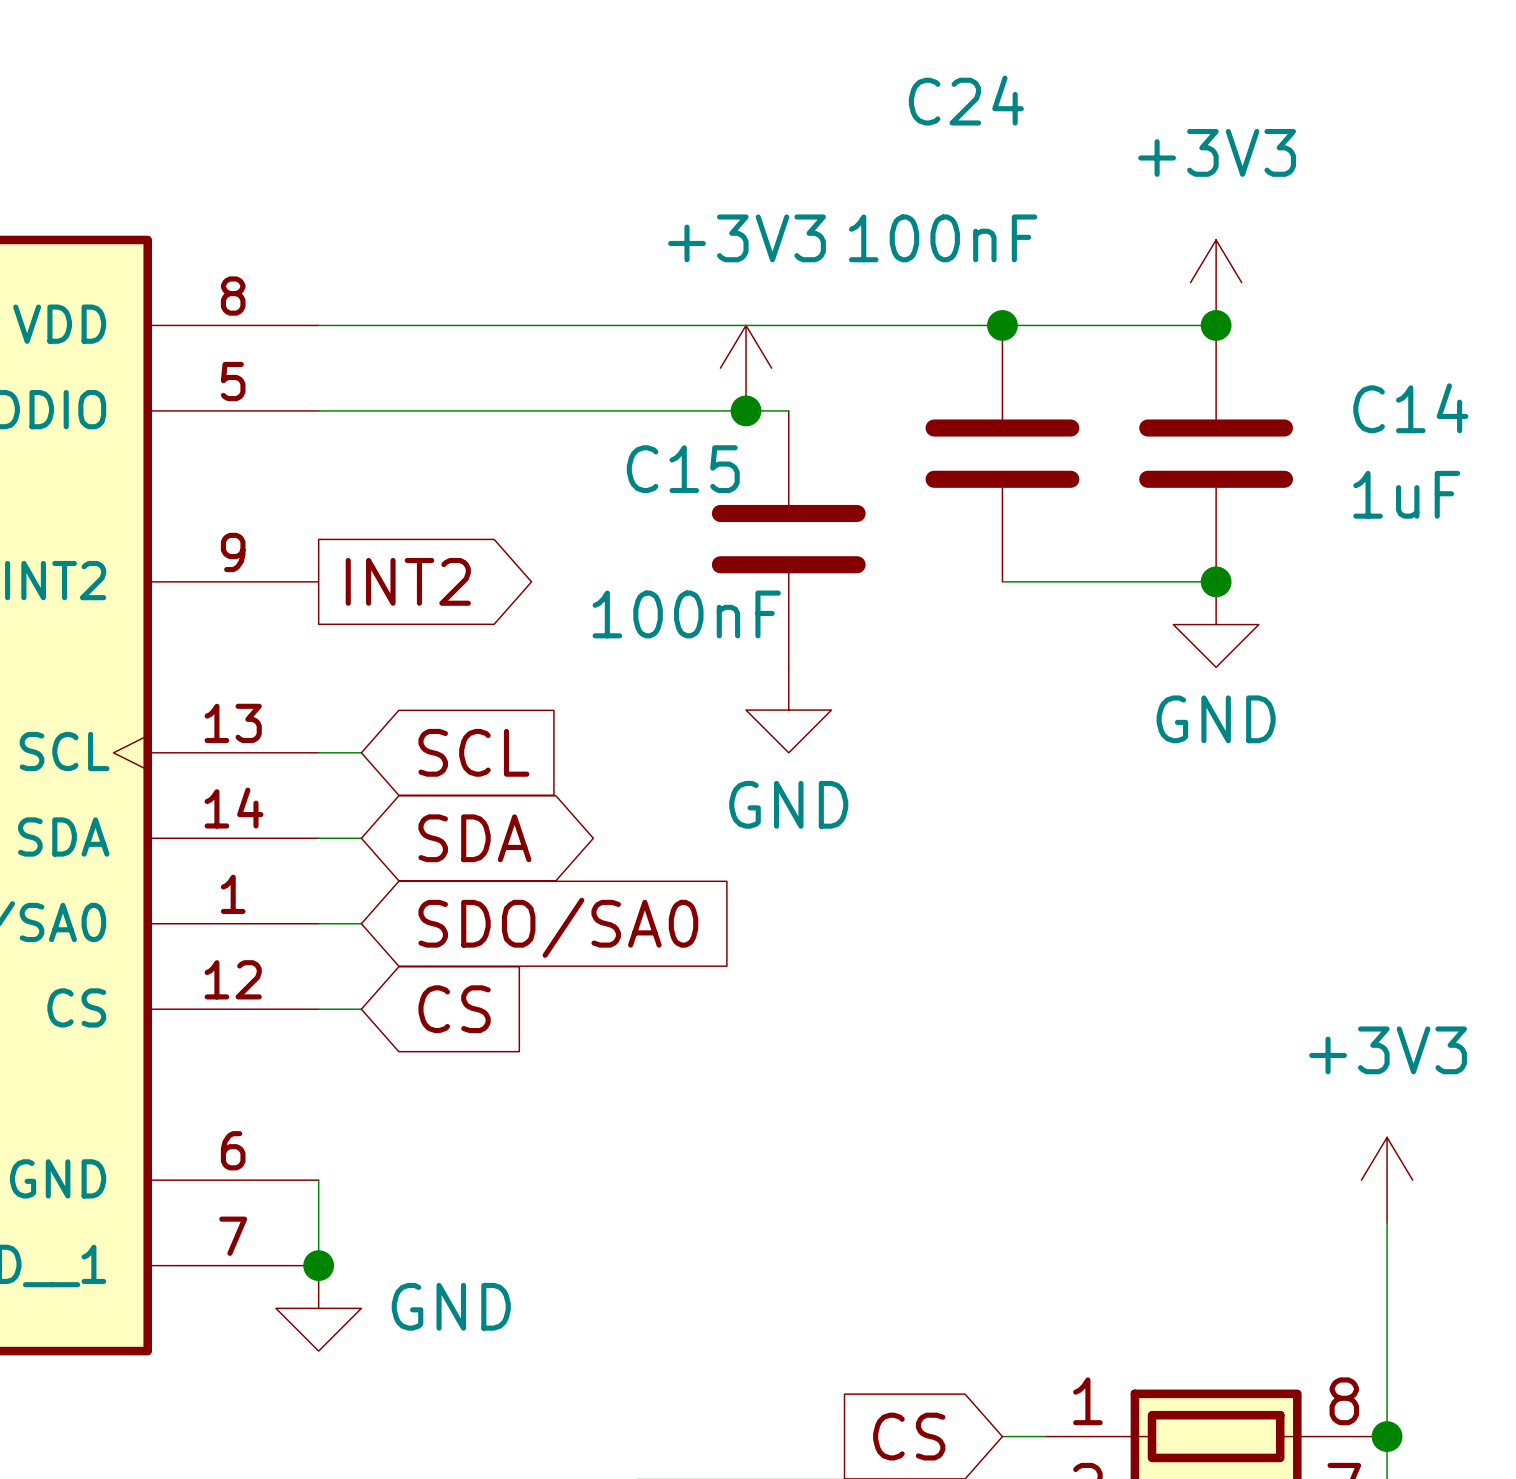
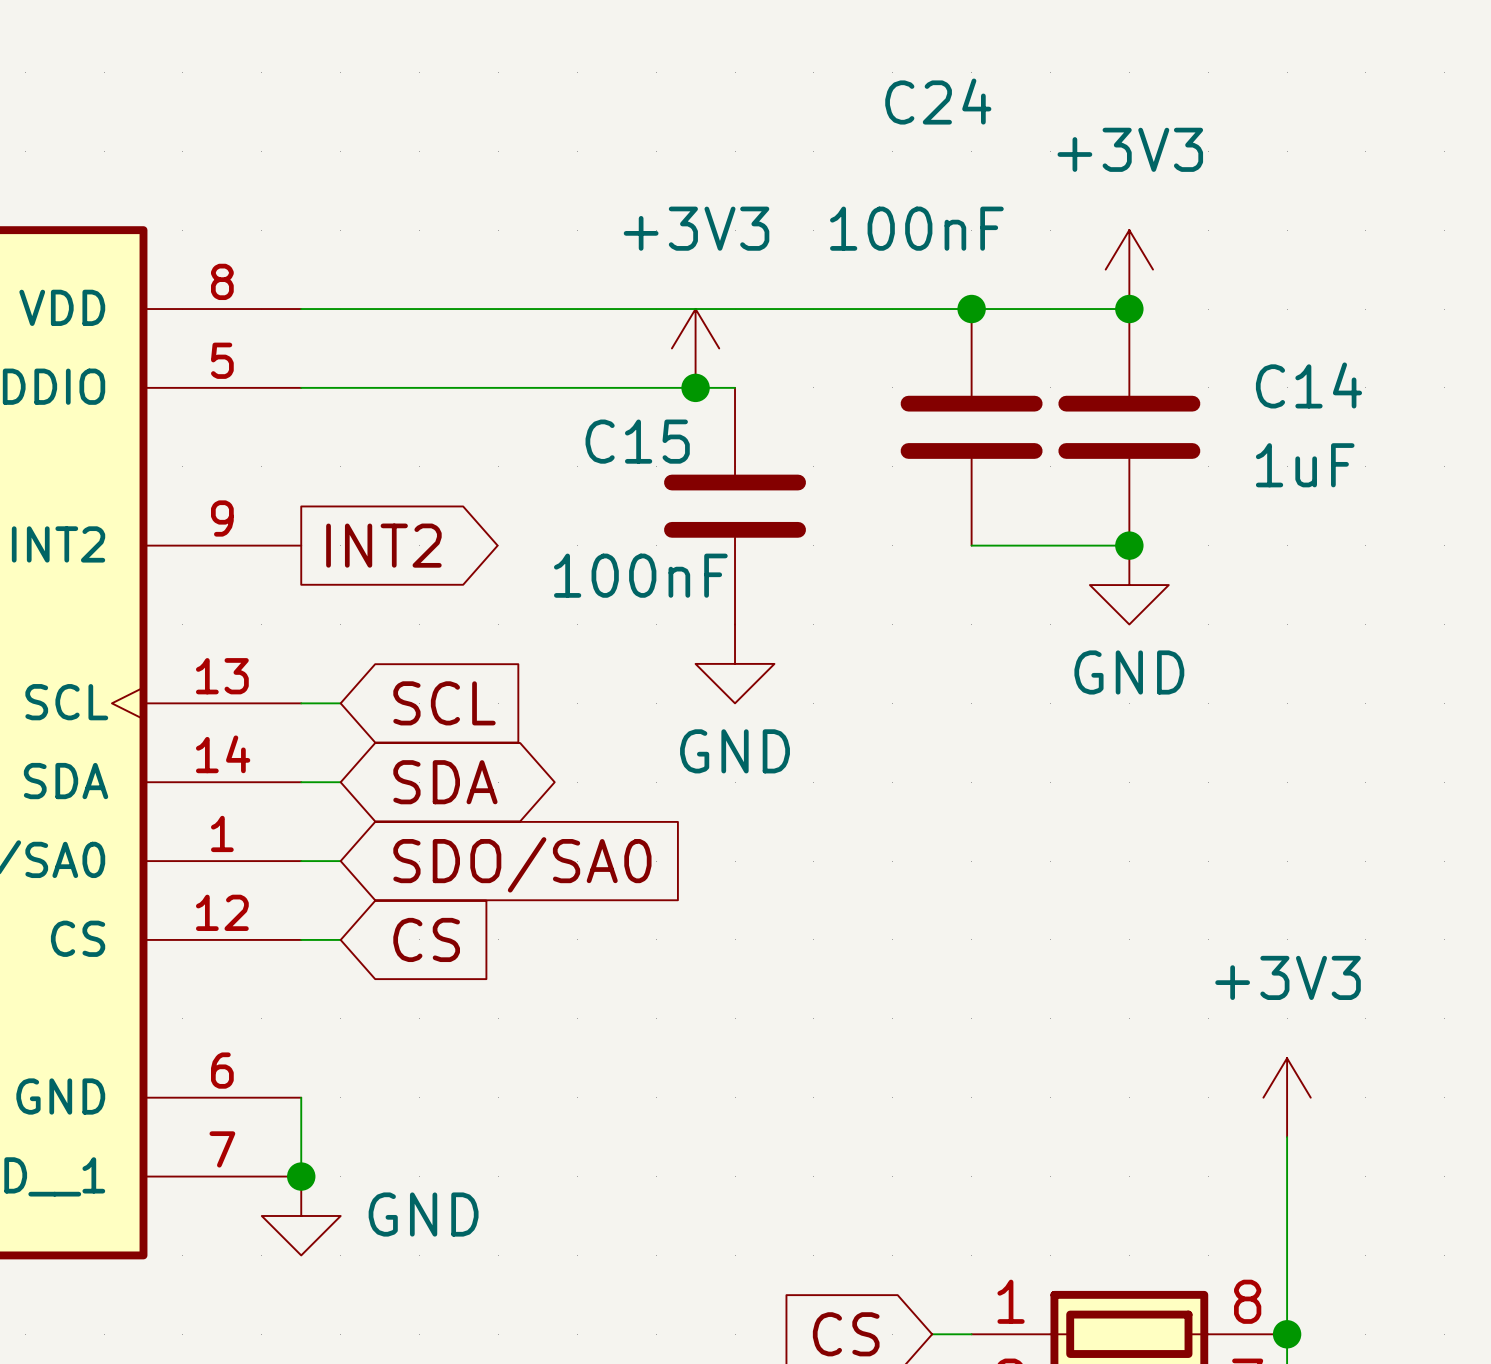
junction position: (1002, 325) -> (971, 309)
C24 position: (1002, 453) -> (971, 427)
wire: (1002, 581) (1045, 581) -> none

